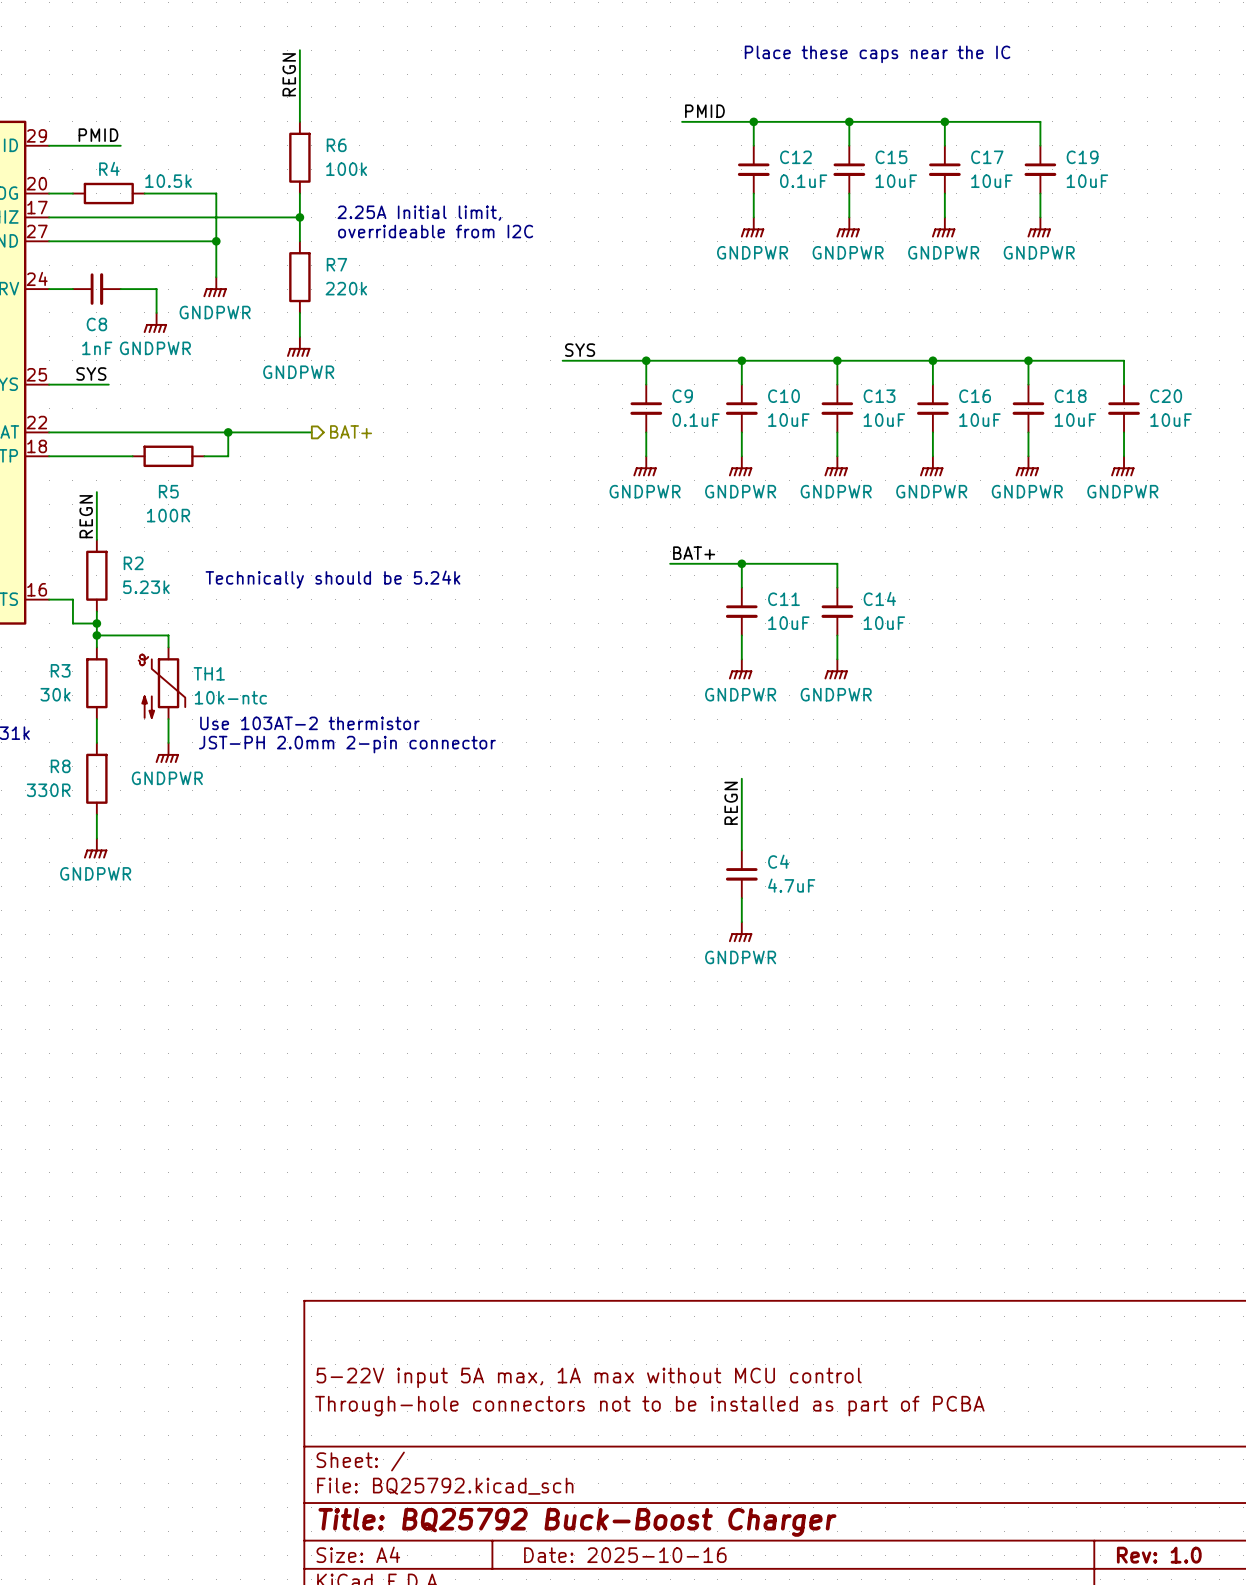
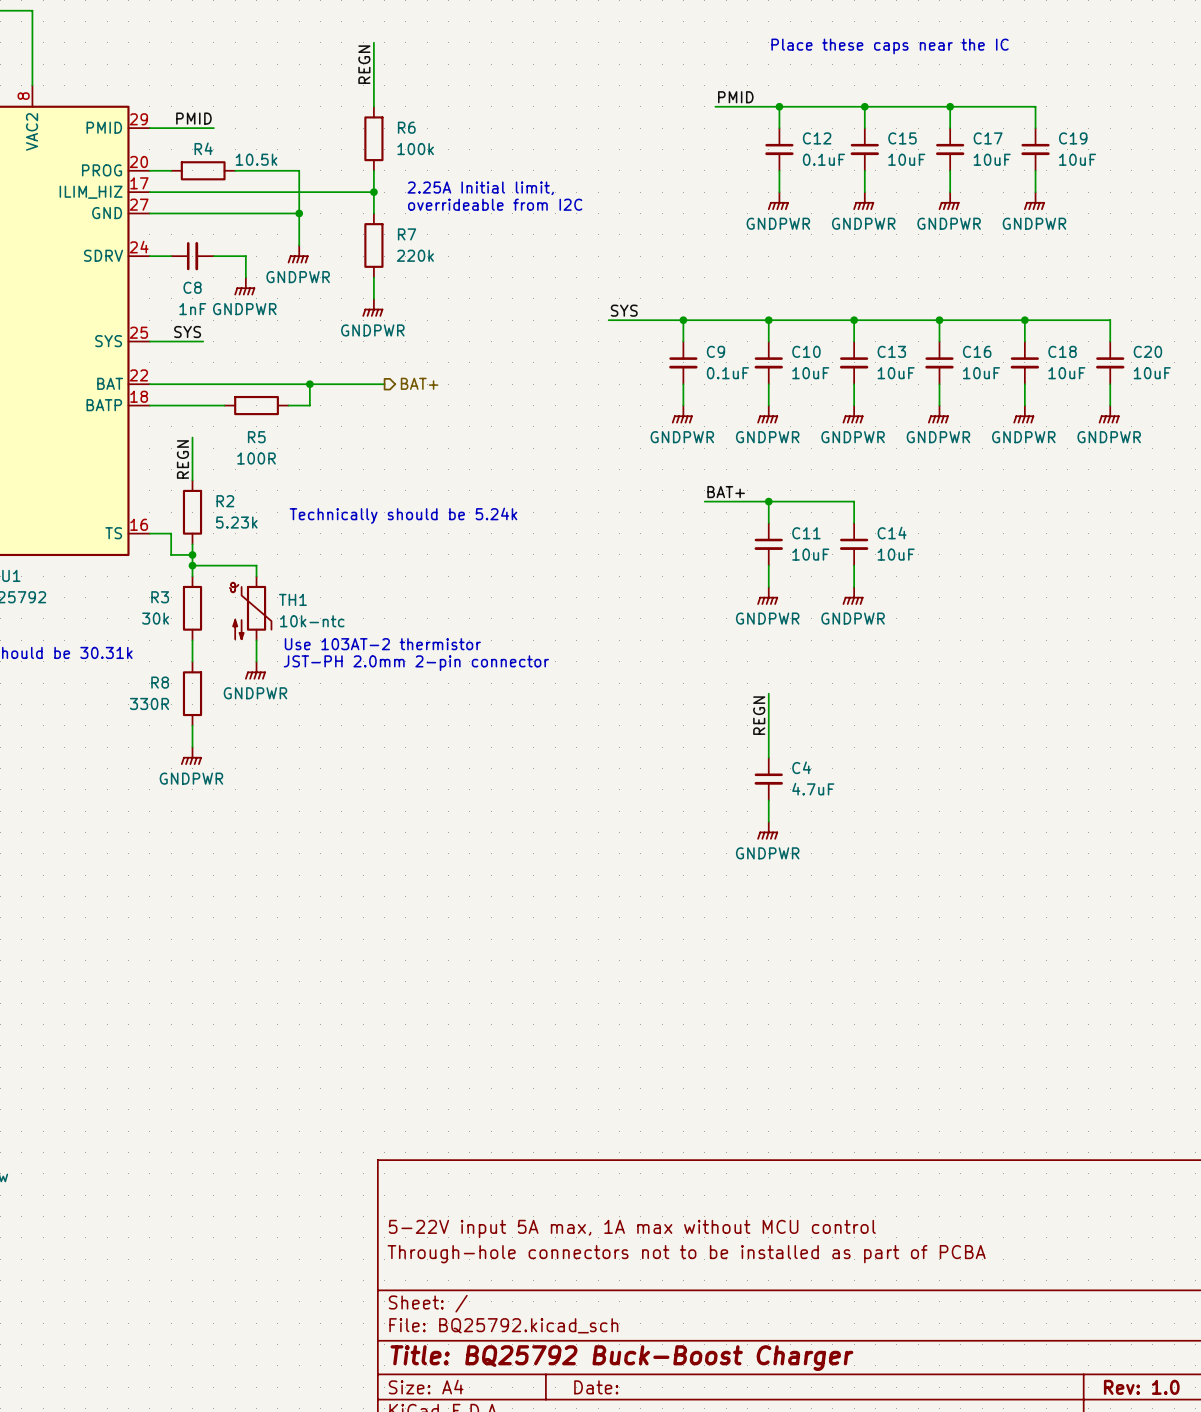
title block: Date: 2025-10-16 (625, 1555) -> Date: (596, 1387)

